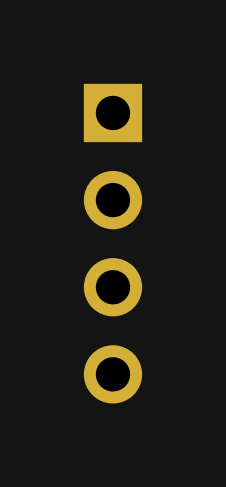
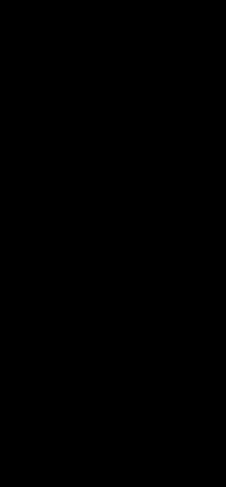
part: (112, 243) -> none

